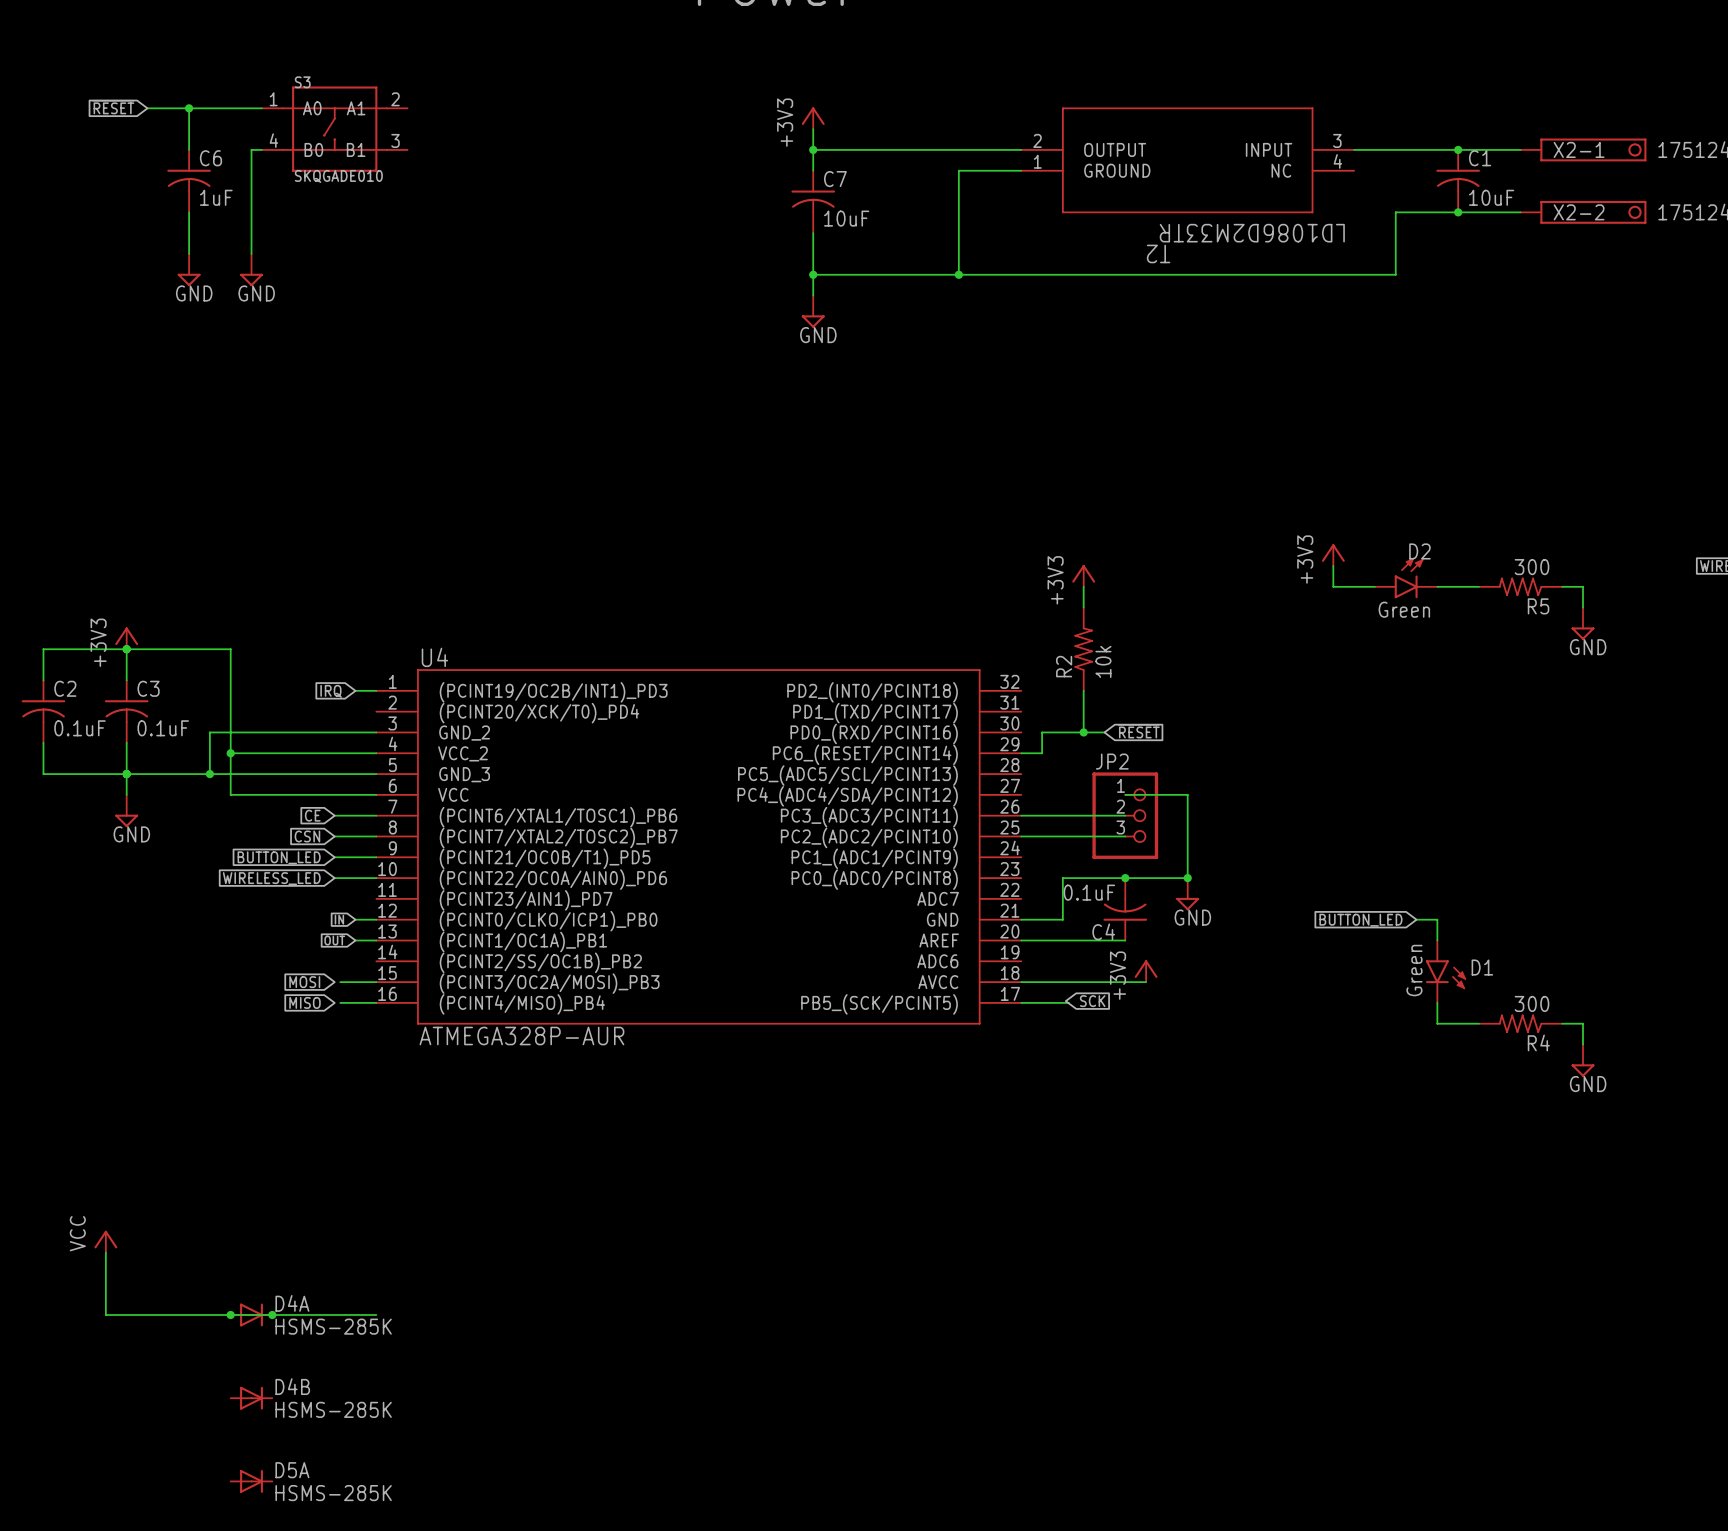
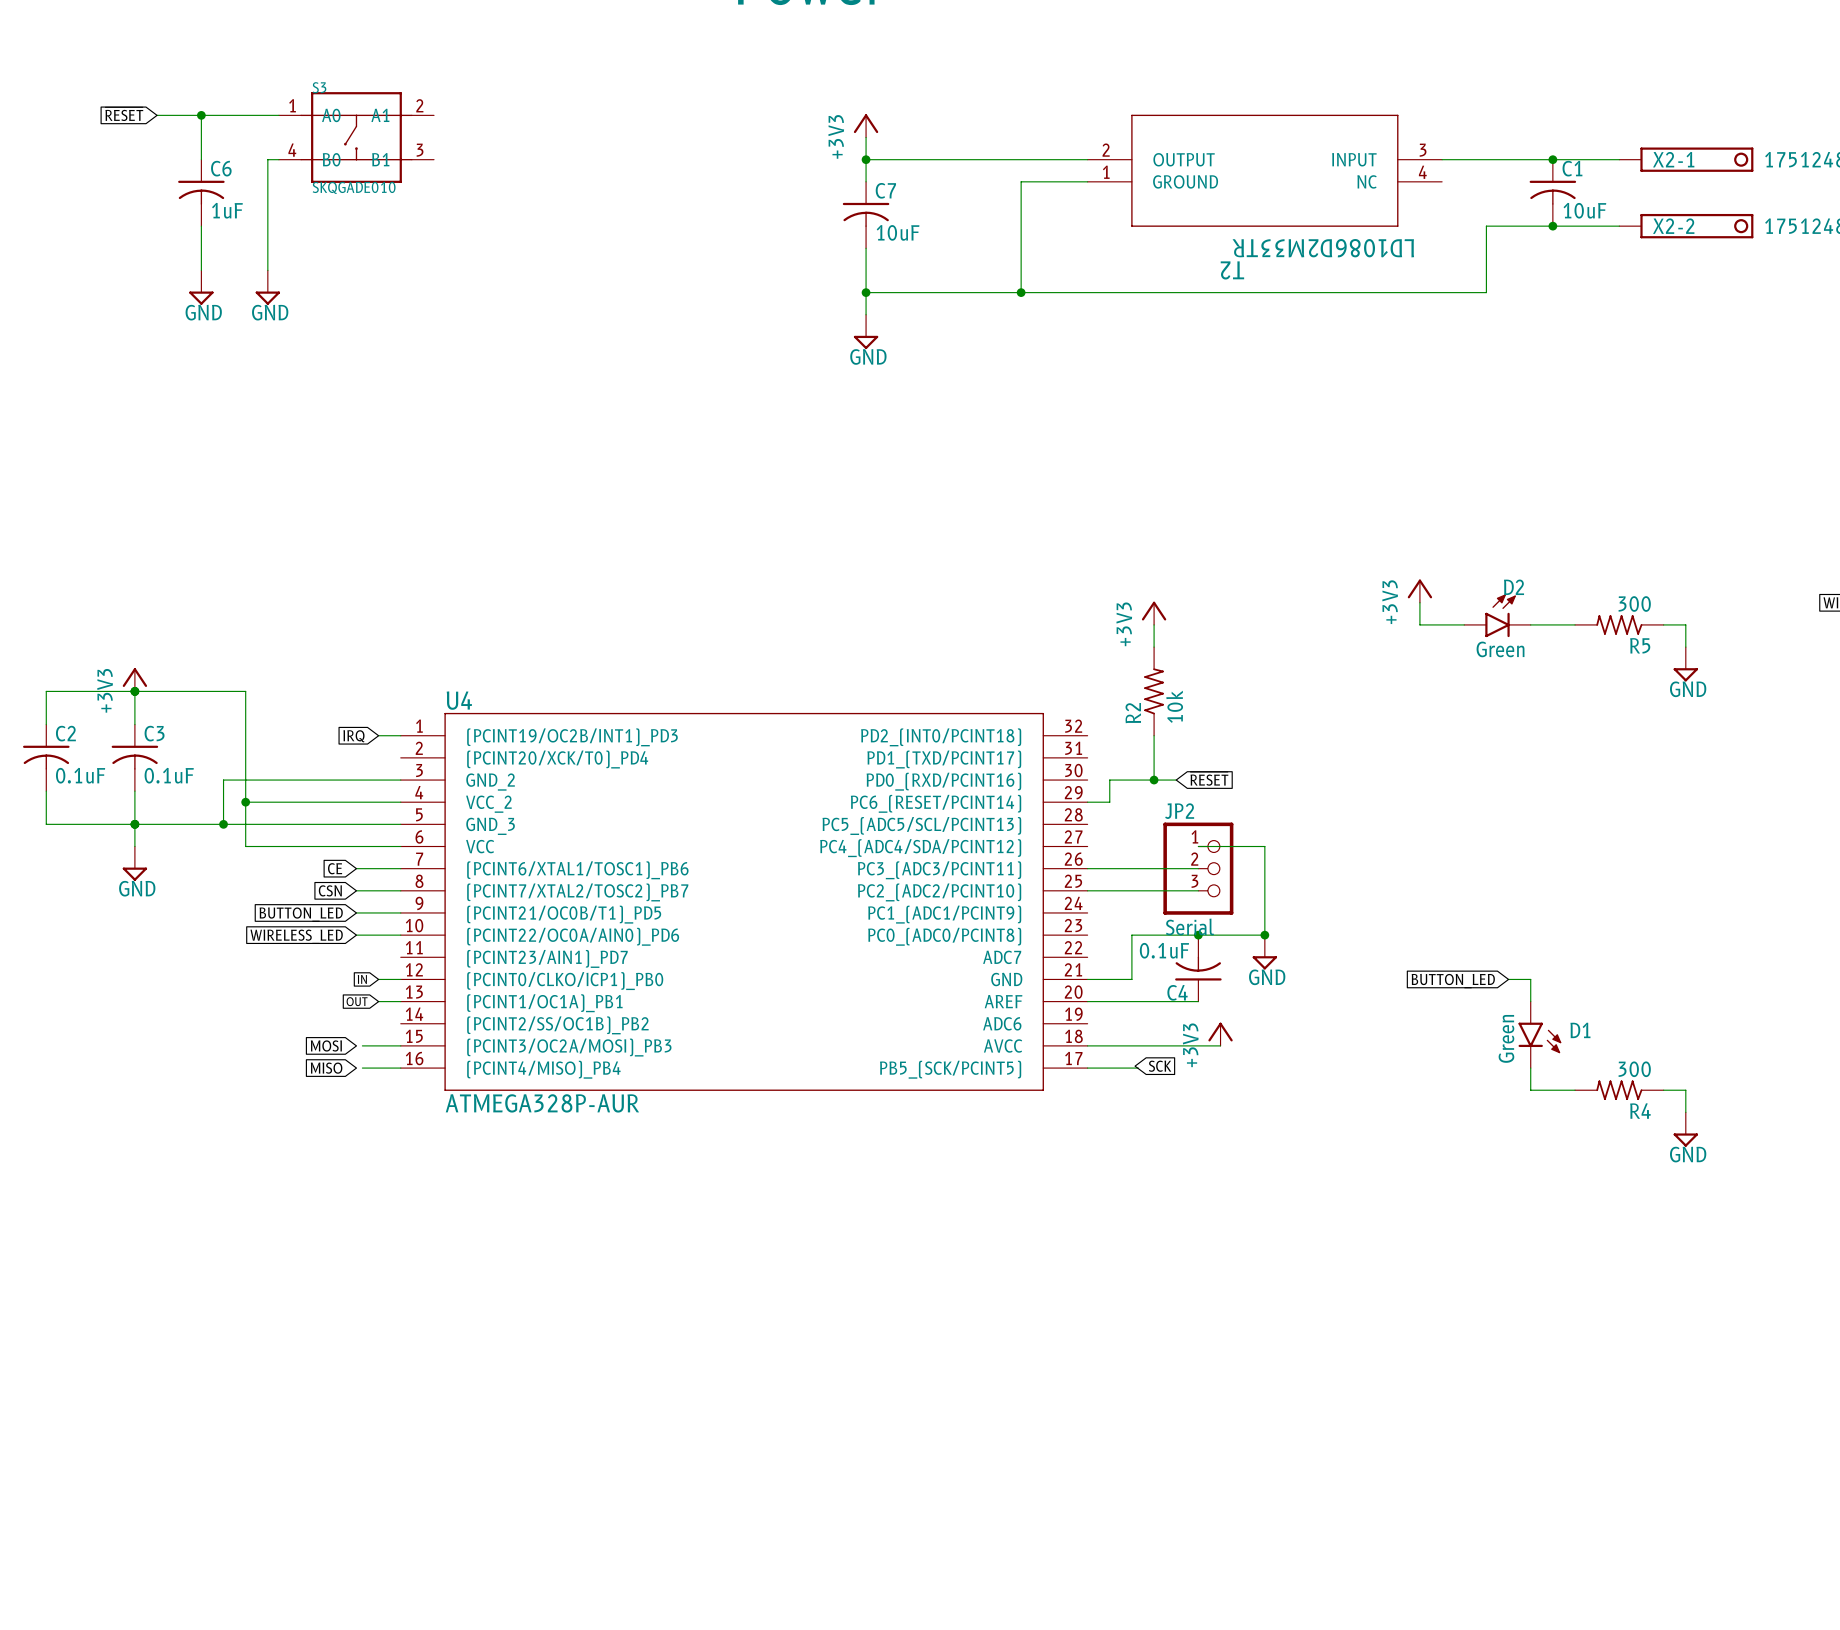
JP2 value: none -> Serial (1189, 926)
power symbol: VCC (105, 1241) -> none
wire: (105, 1252) (105, 1314) (376, 1314) -> none
junction: (230, 1314) -> none
D4A: HSMS-285K (251, 1314) -> none
junction: (272, 1314) -> none
D4B: HSMS-285K (251, 1398) -> none
D5A: HSMS-285K (251, 1481) -> none

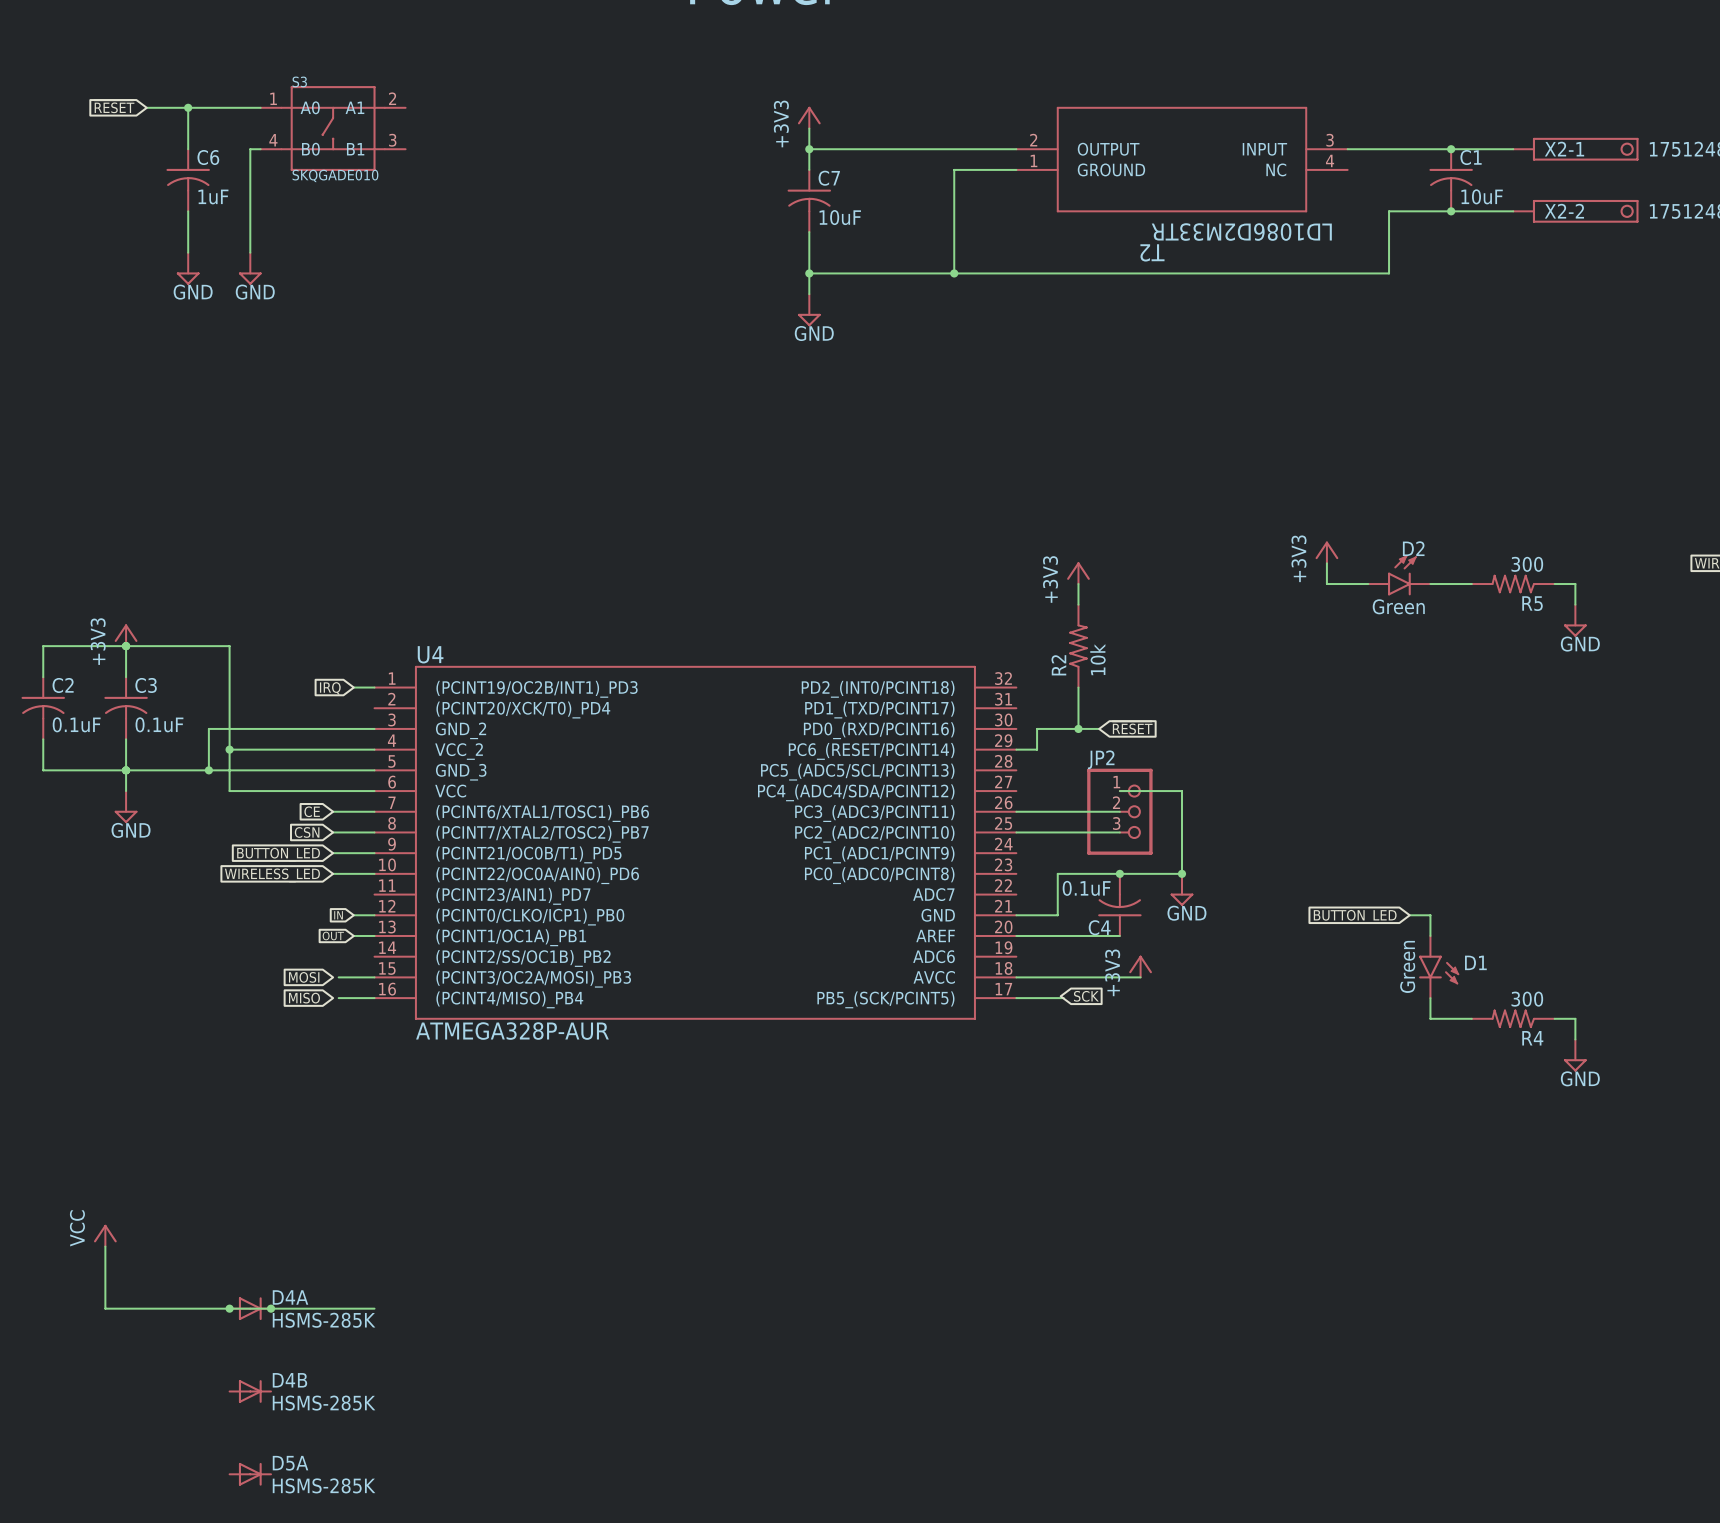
JP2 value: Serial (1189, 926) -> none
power symbol: none -> VCC (105, 1235)
wire: none -> (105, 1246) (105, 1308) (374, 1308)
junction: none -> (229, 1308)
D4A: none -> HSMS-285K (250, 1308)
junction: none -> (271, 1308)
D4B: none -> HSMS-285K (250, 1391)
D5A: none -> HSMS-285K (250, 1474)

